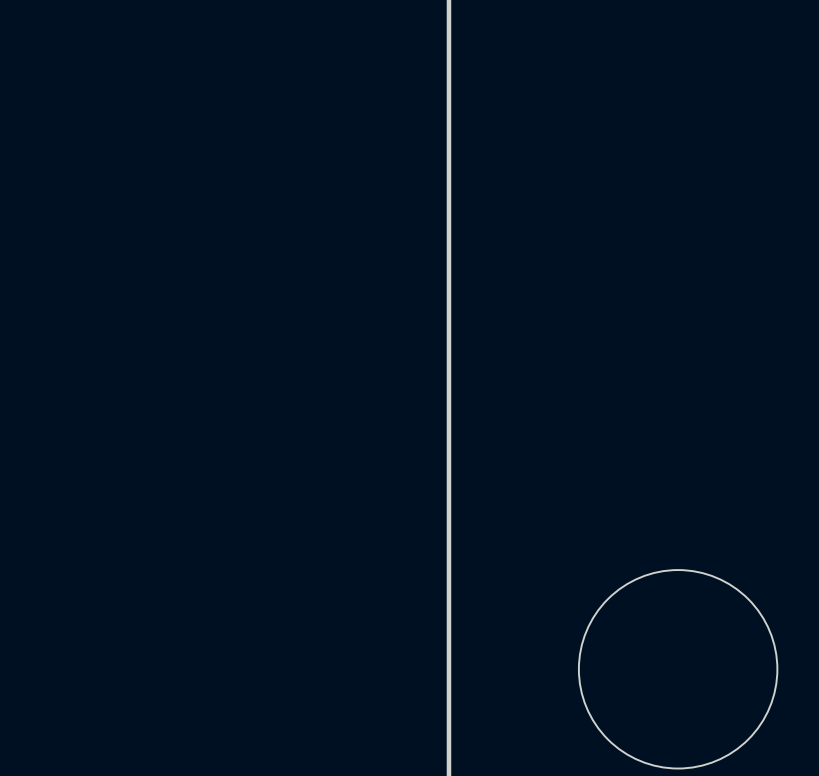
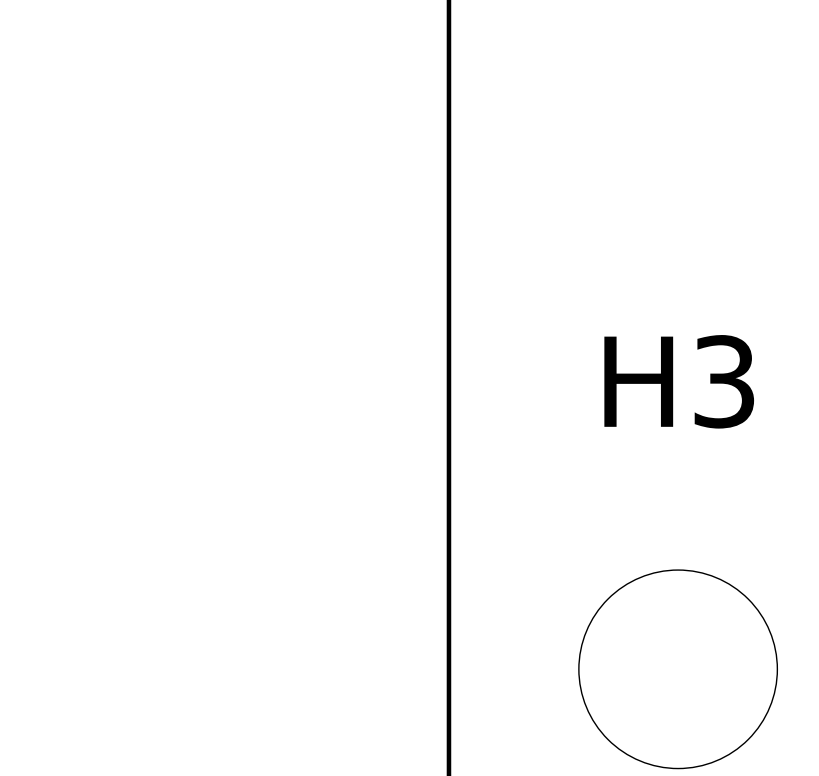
H3 name: none -> H3 (679, 381)

